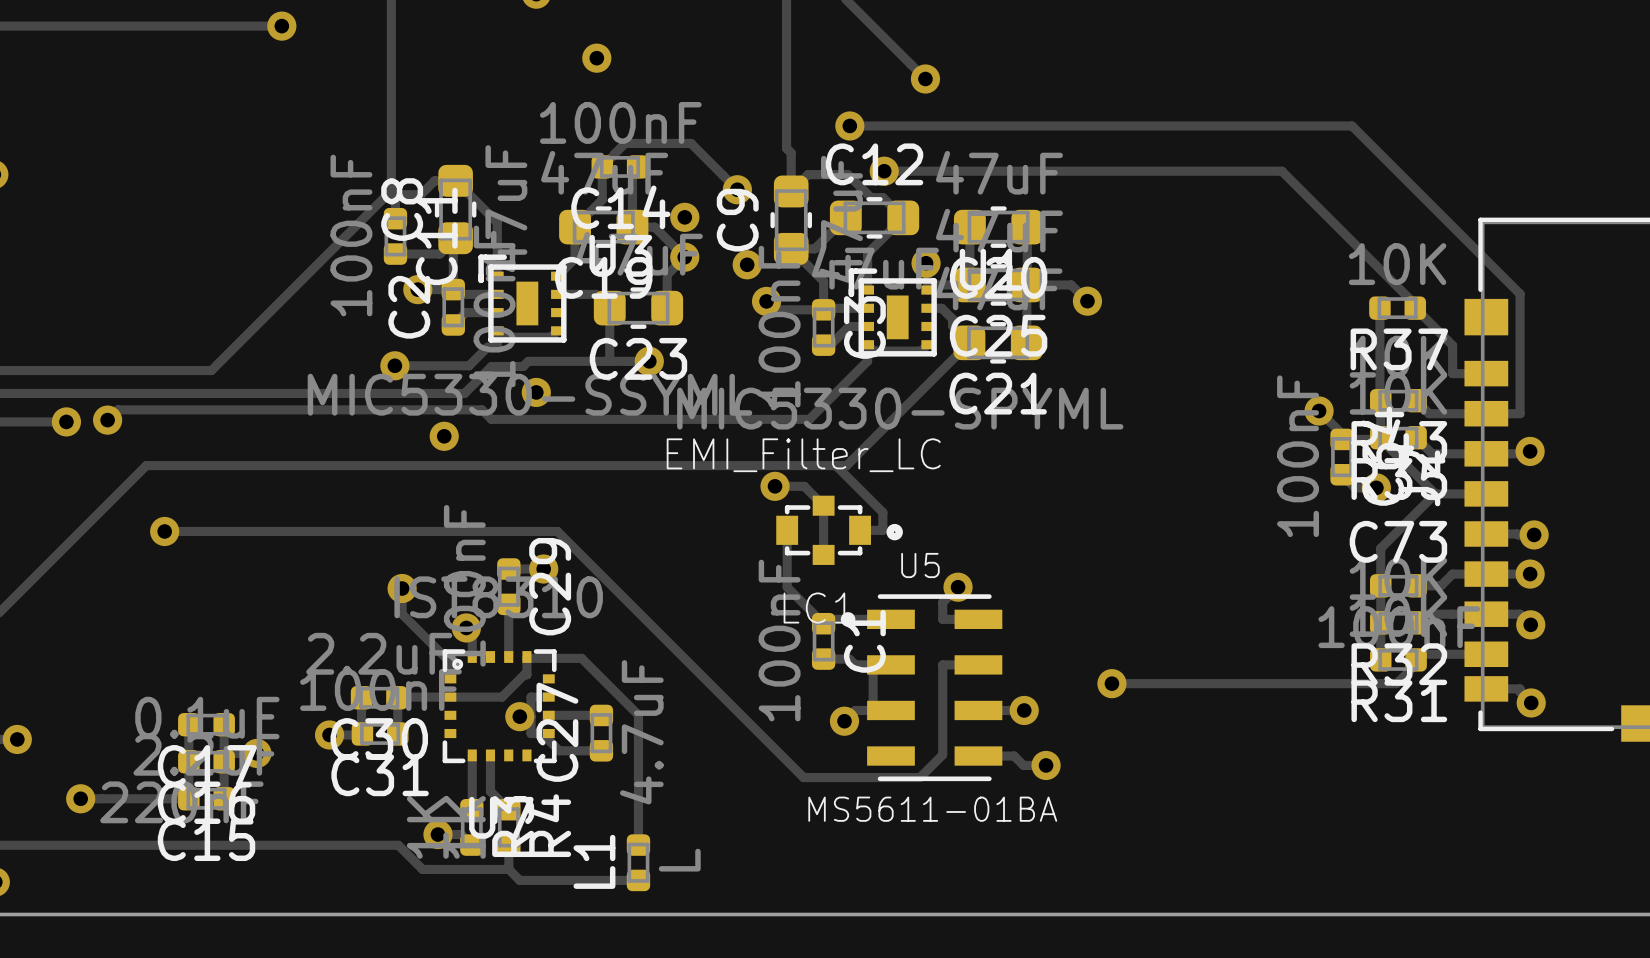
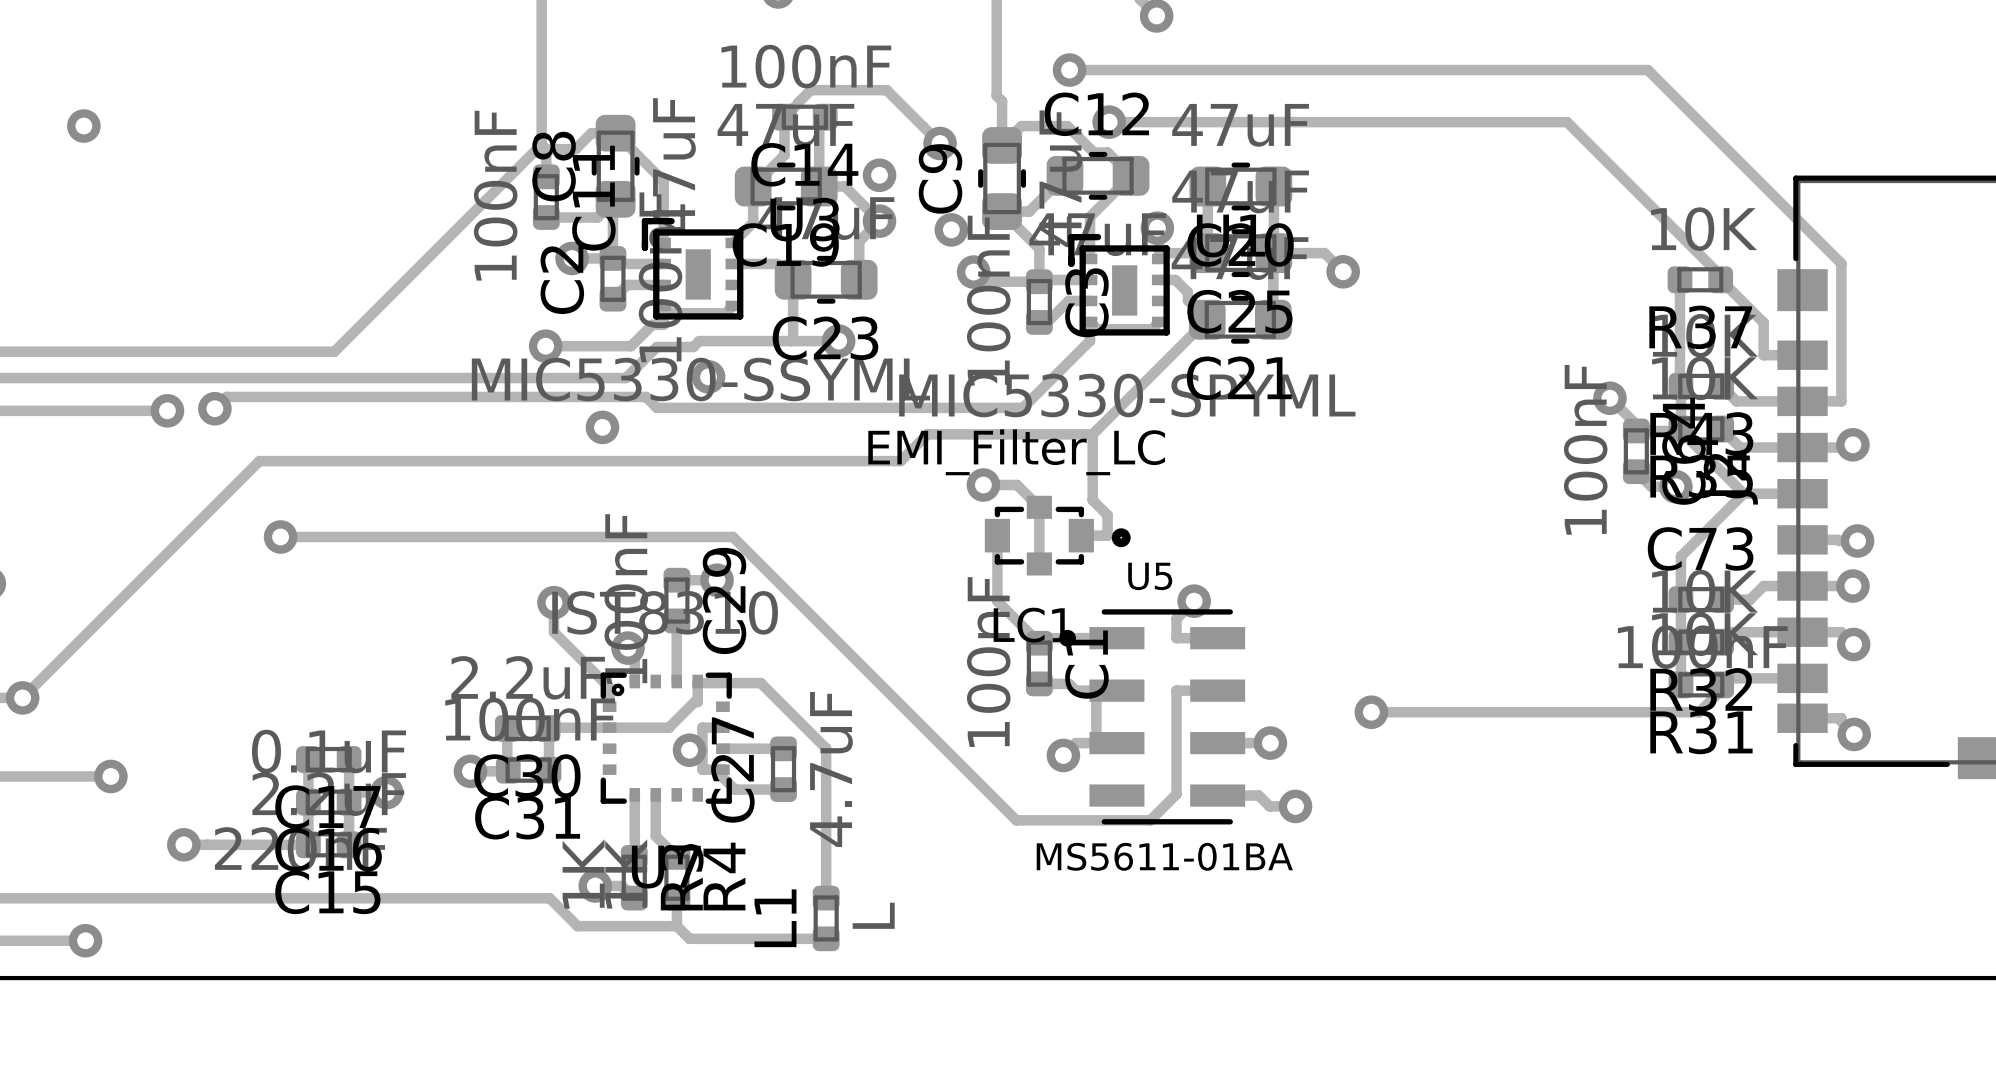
track: (869, 442) (846, 465) (703, 465) -> (1092, 500) (1092, 434) (927, 434) (900, 461)
track: (835, 465) (869, 499) -> none

